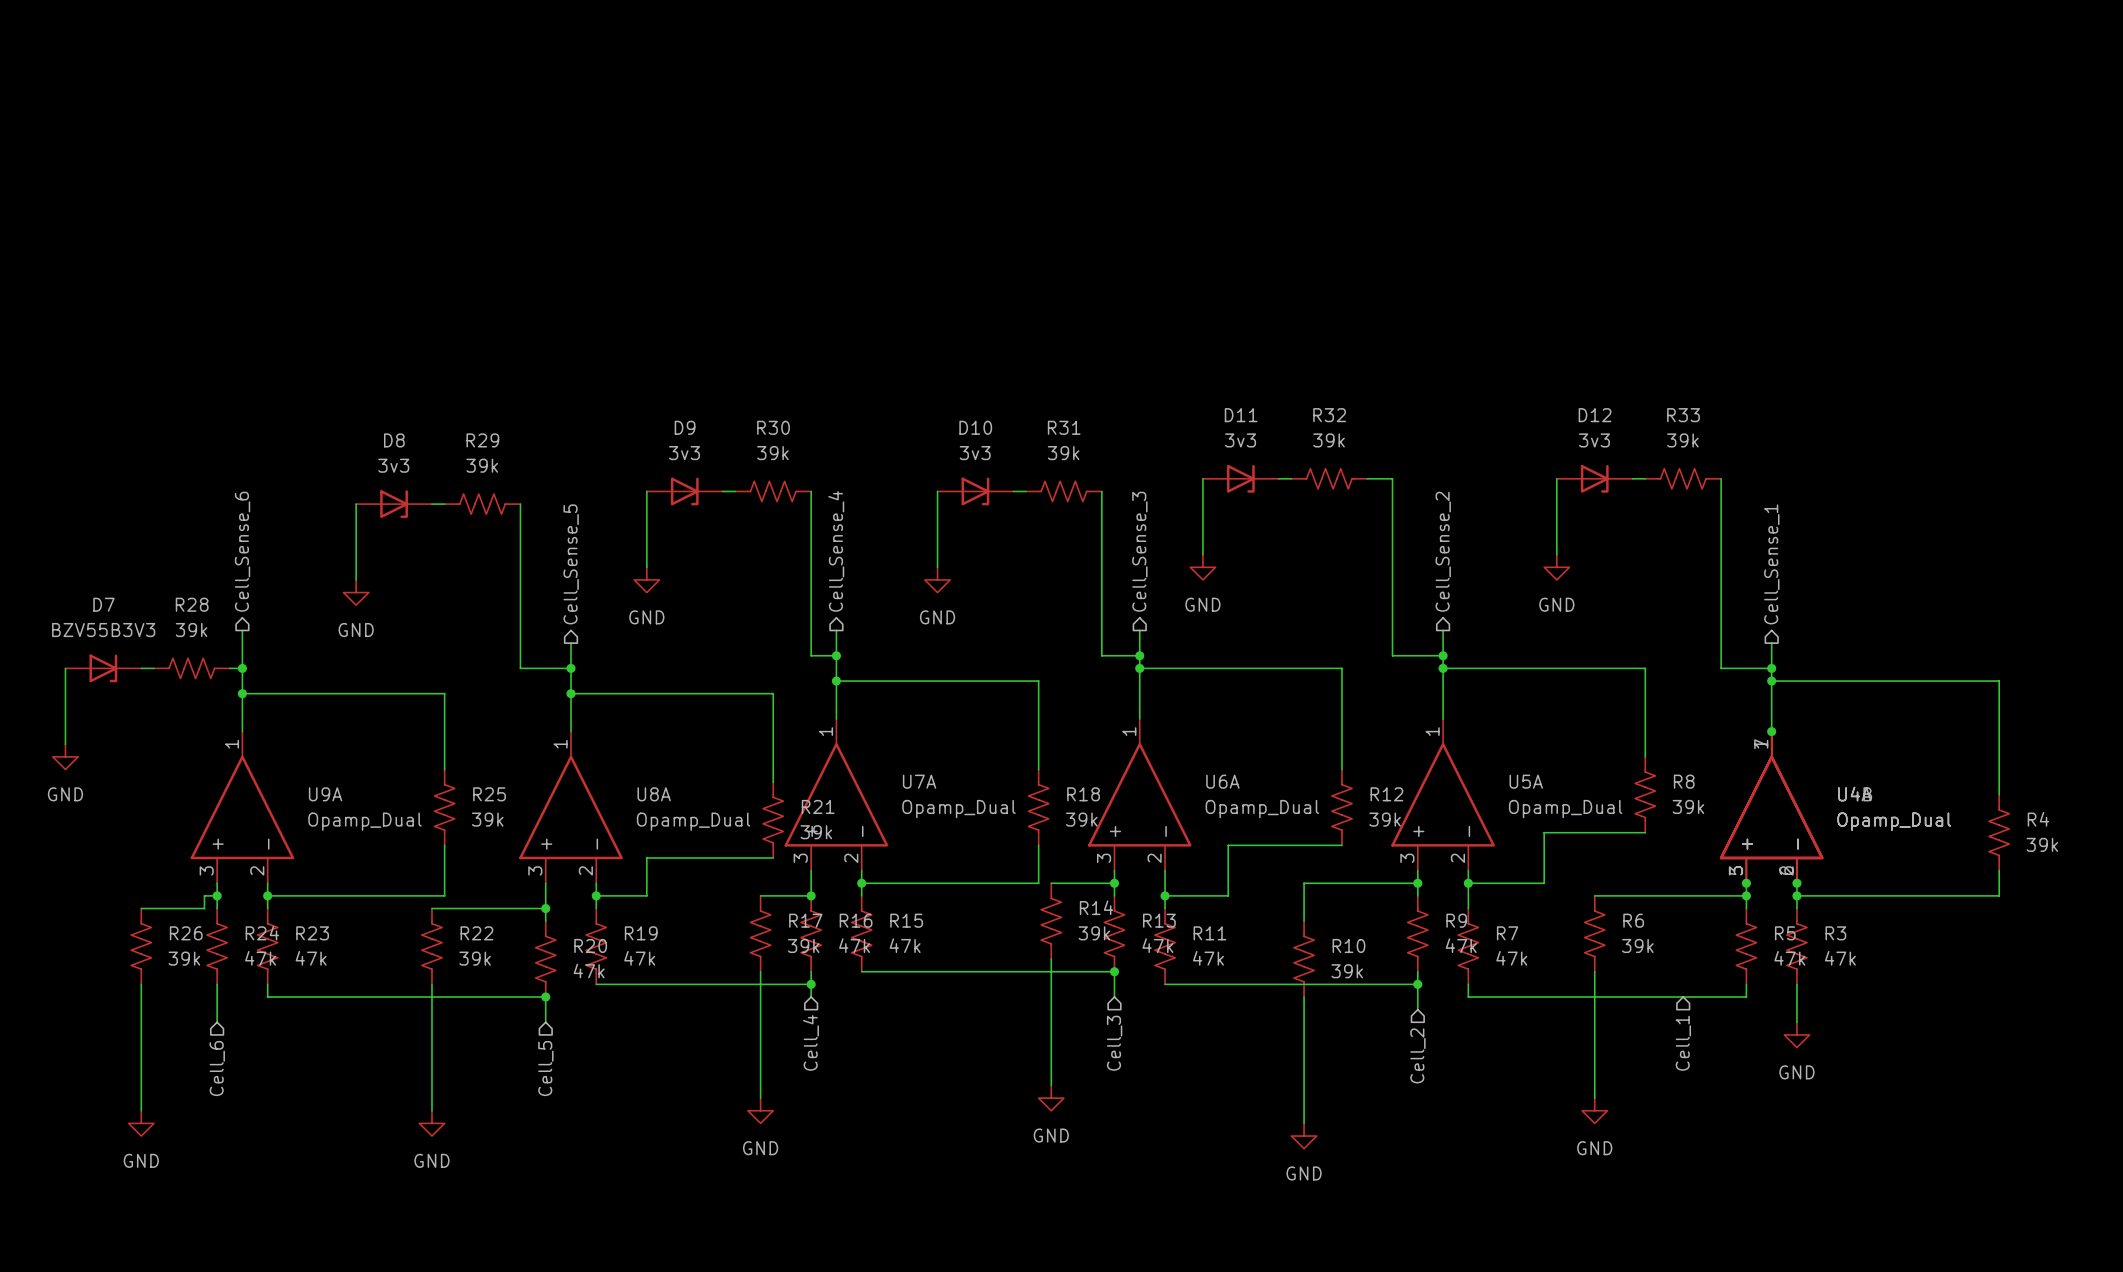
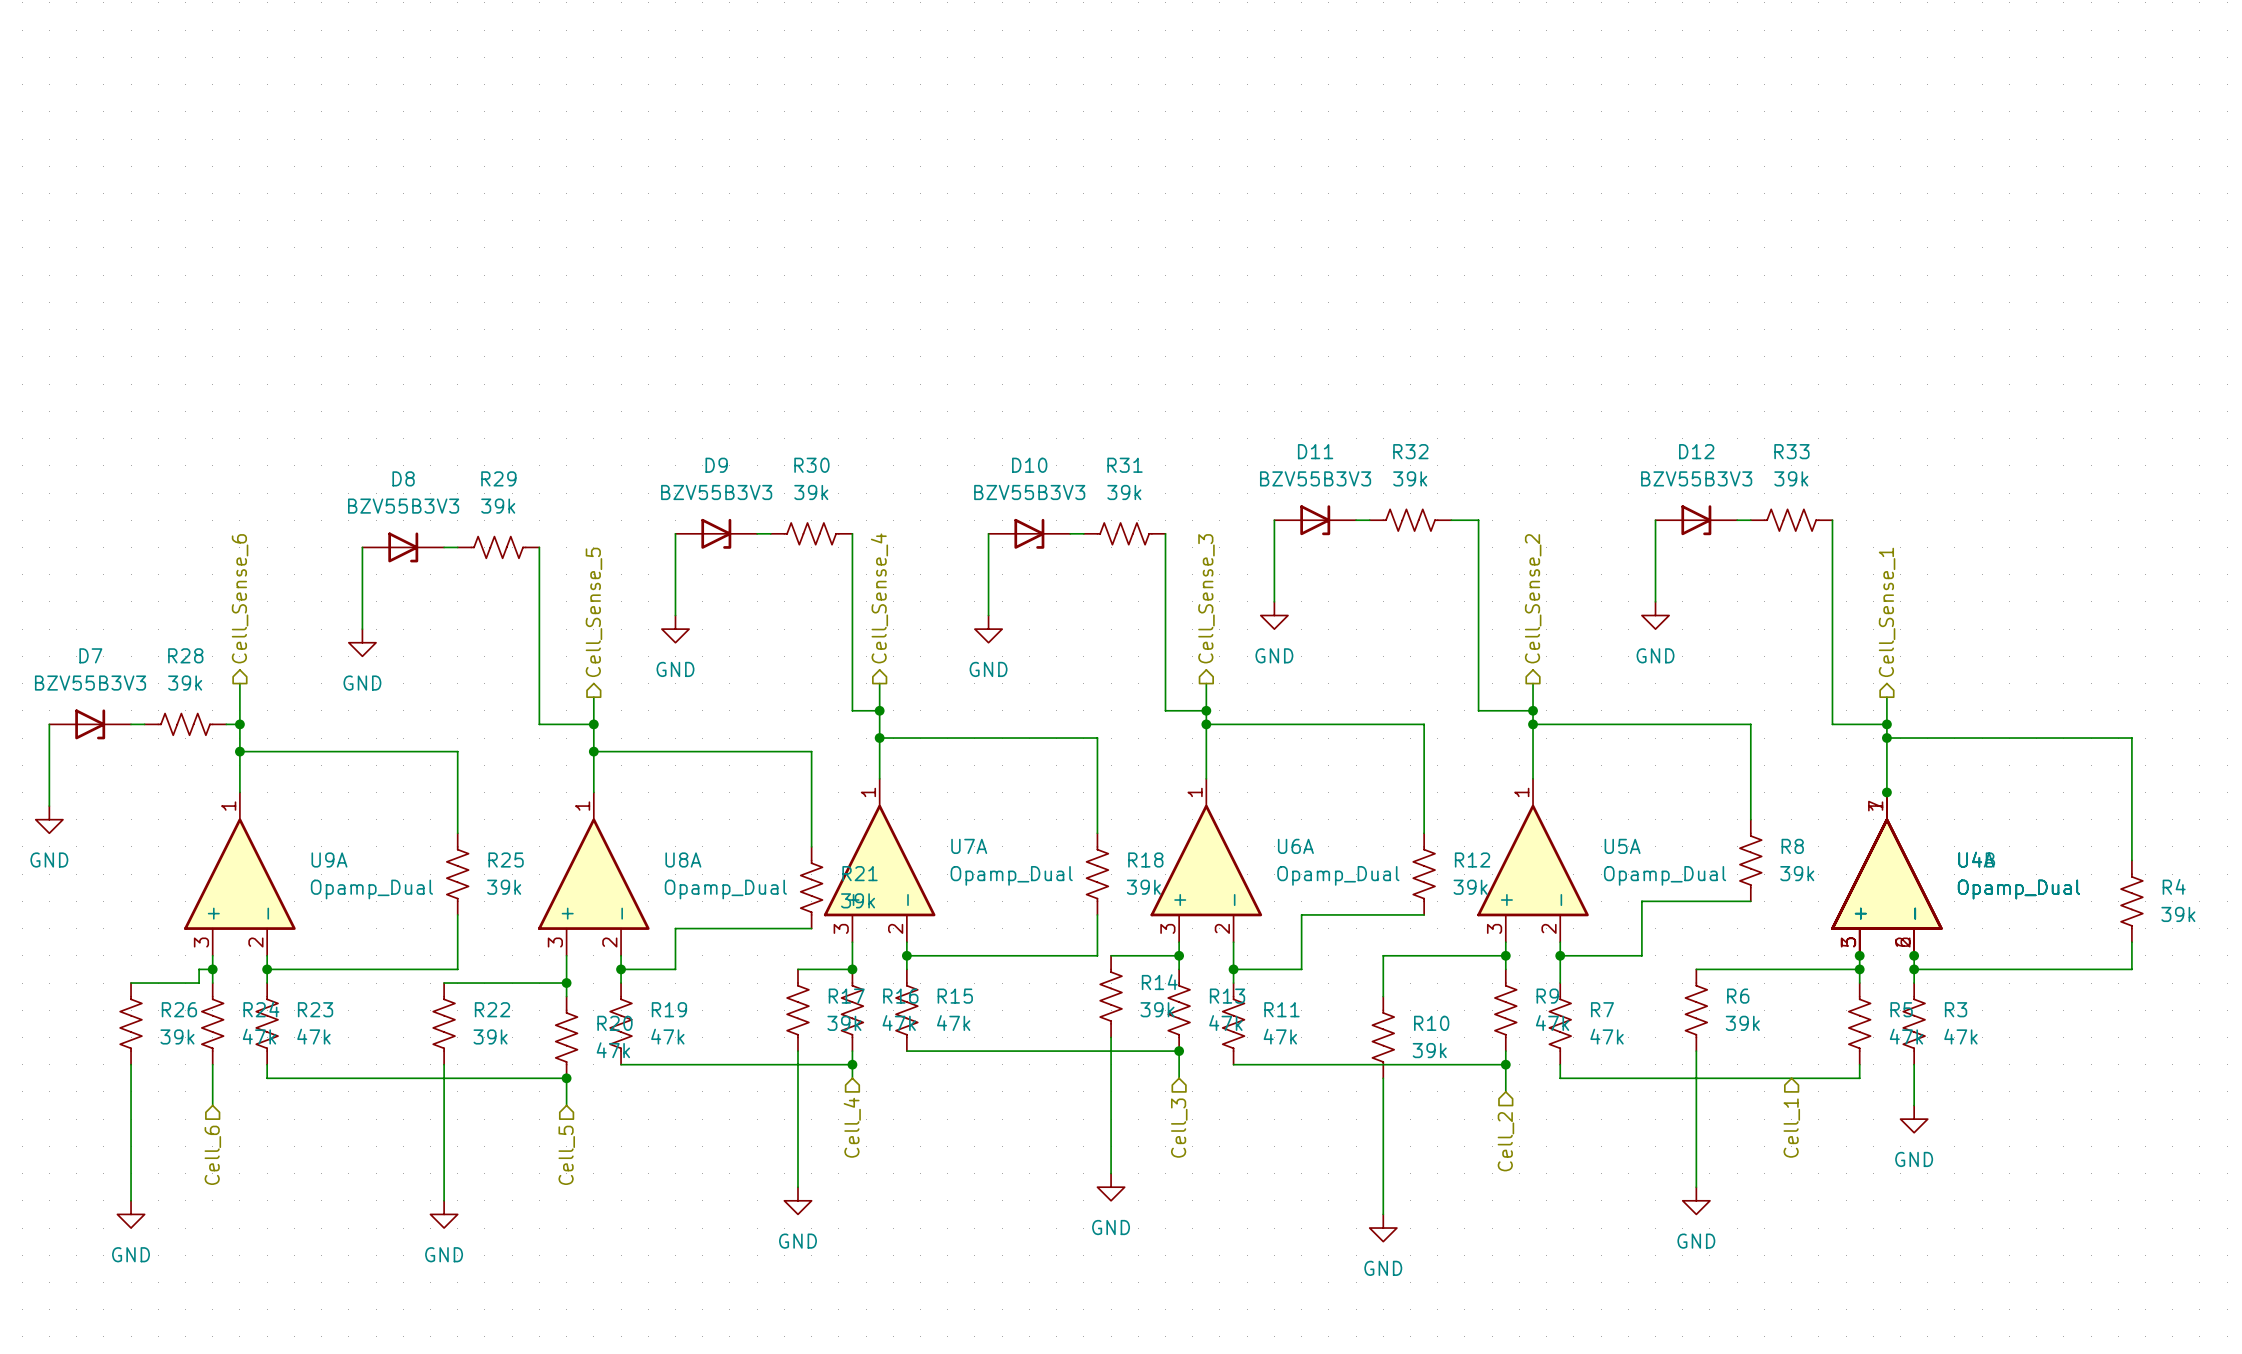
D11 value: 3v3 (1240, 440) -> BZV55B3V3 (1315, 478)
D12 value: 3v3 (1594, 440) -> BZV55B3V3 (1696, 478)
D9 value: 3v3 (684, 453) -> BZV55B3V3 (716, 492)
D10 value: 3v3 (975, 453) -> BZV55B3V3 (1029, 492)
D8 value: 3v3 (393, 465) -> BZV55B3V3 (403, 506)

